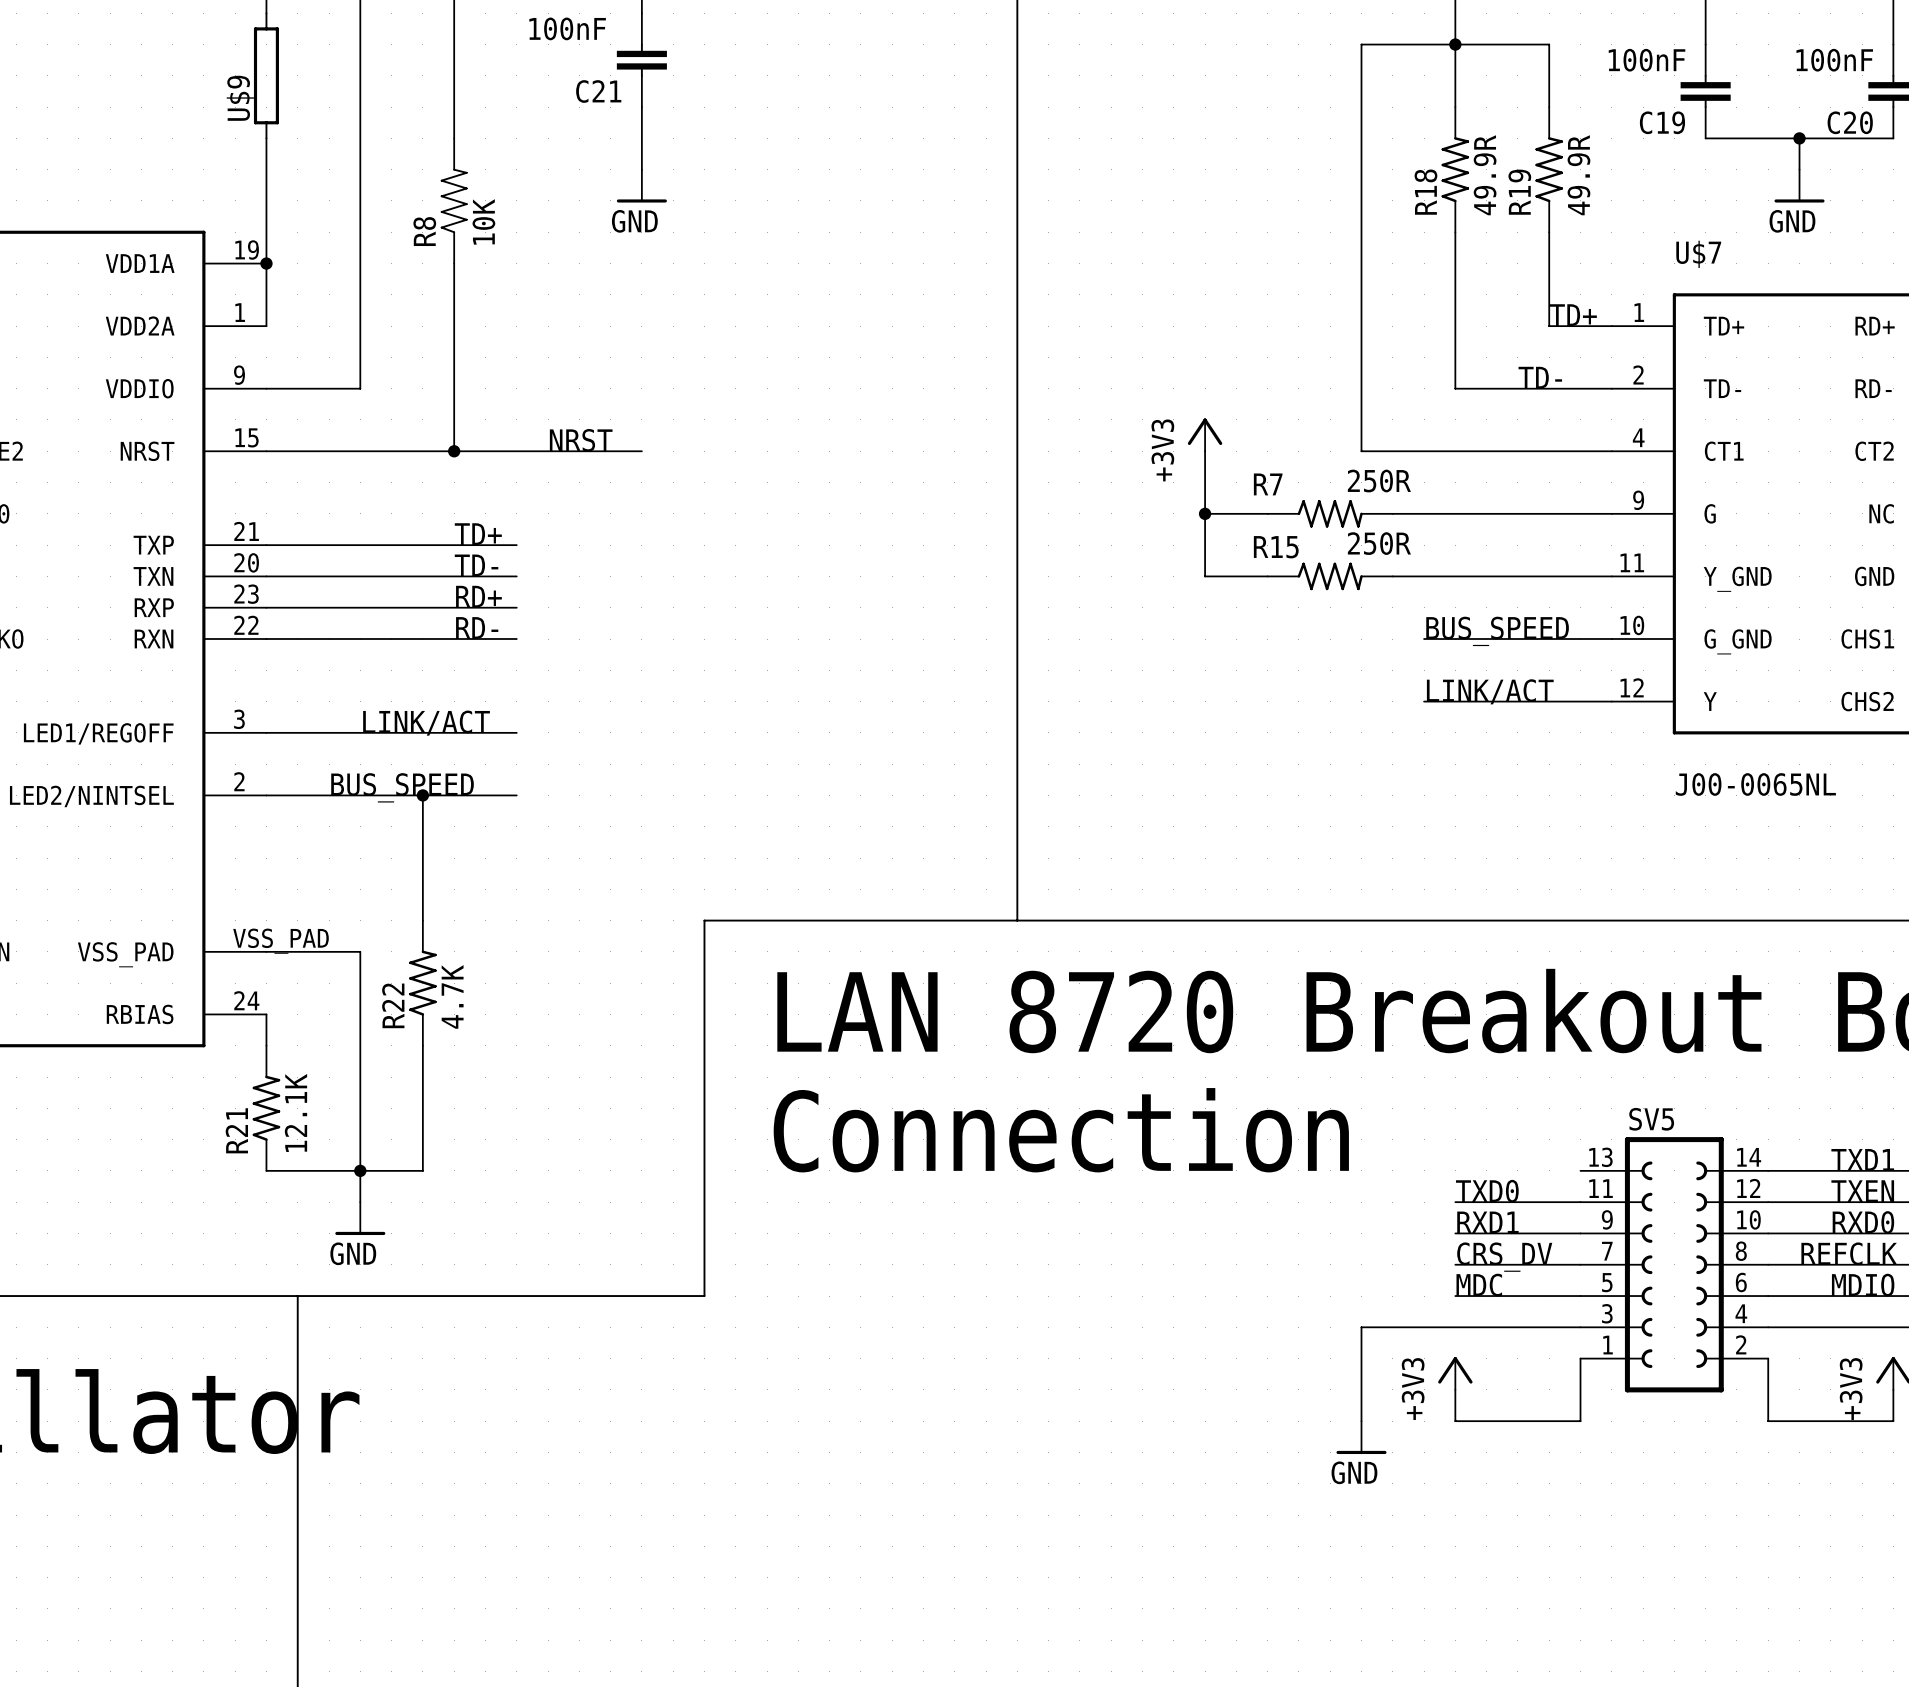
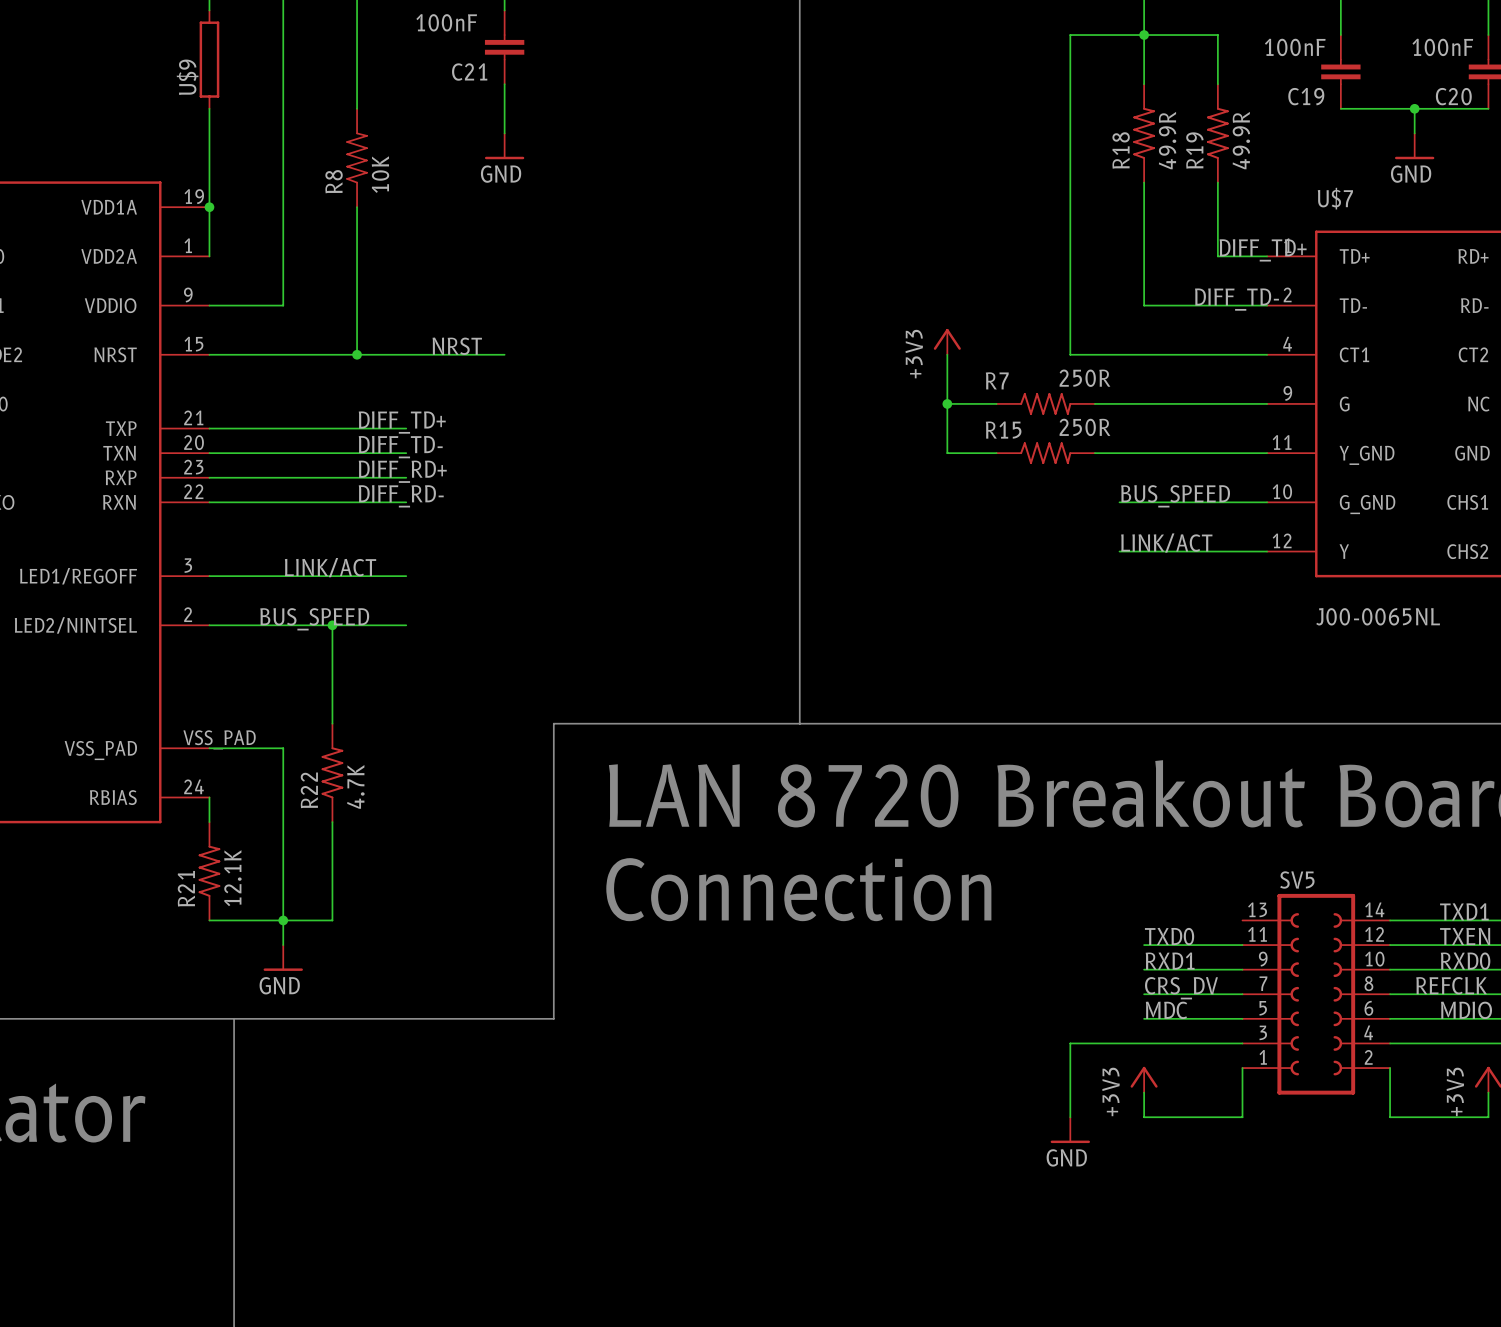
label: TD+ (1573, 315) -> DIFF_TD+ (1263, 250)
label: TD- (1540, 377) -> DIFF_TD- (1236, 299)
label: TD+ (478, 534) -> DIFF_TD+ (402, 422)
label: TD- (476, 565) -> DIFF_TD- (400, 447)
label: RD+ (478, 596) -> DIFF_RD+ (402, 471)
label: RD- (477, 628) -> DIFF_RD- (401, 496)

